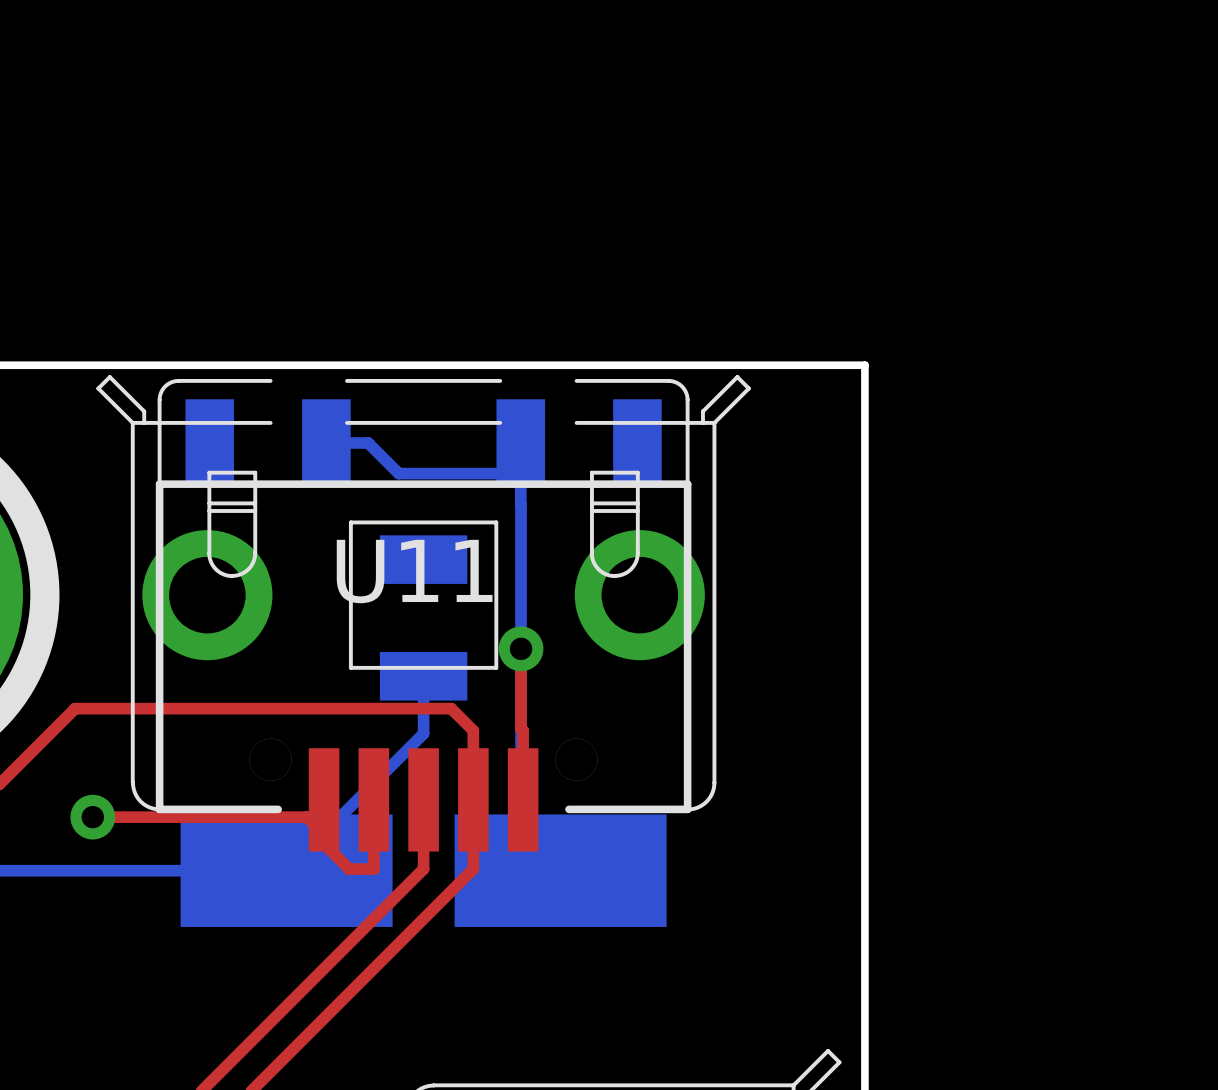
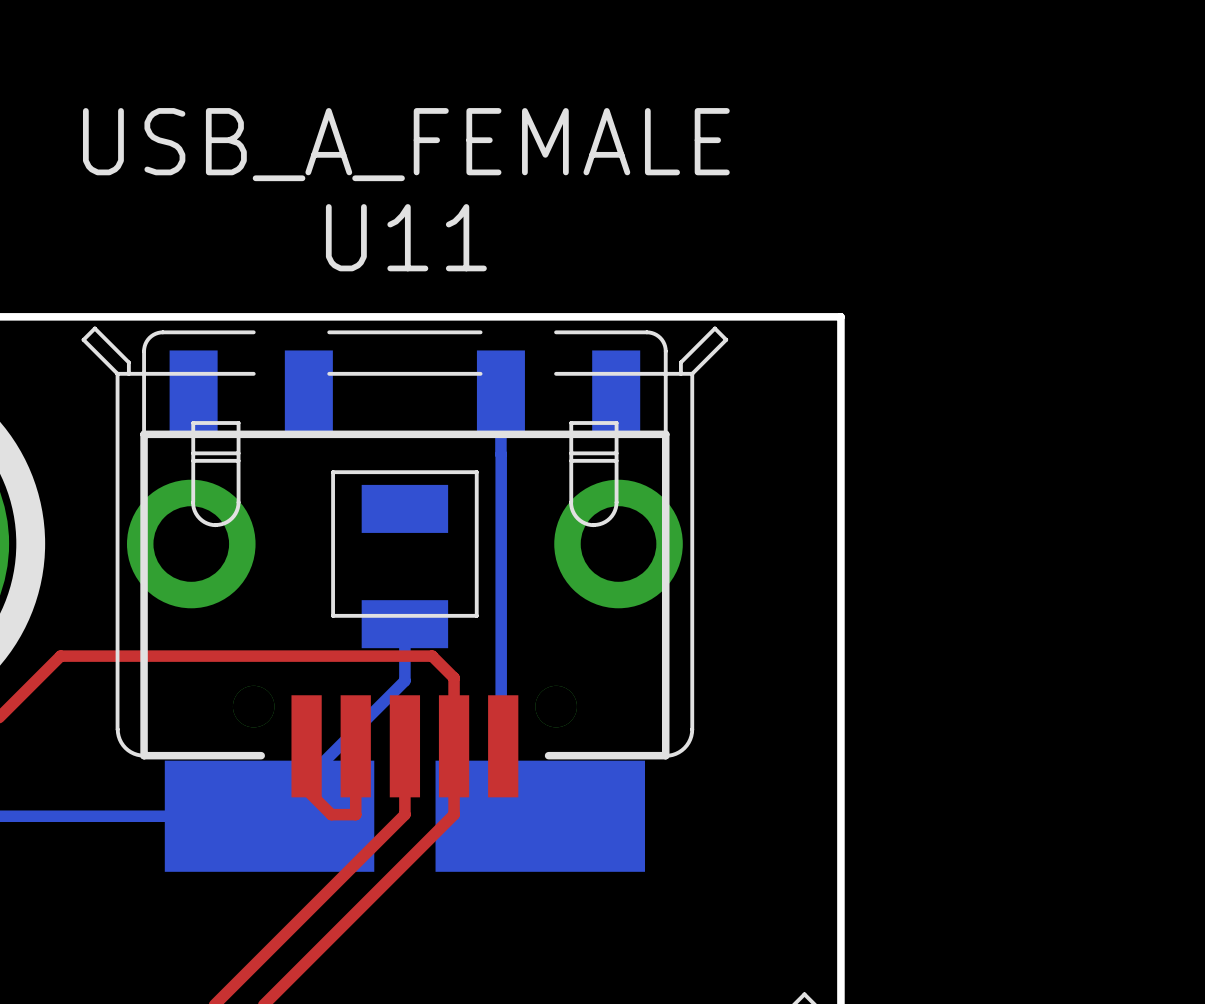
U11 value: none -> USB_A_FEMALE (406, 144)
bottom track: (326, 442) (368, 442) (398, 473) (520, 473) -> none
U11 name position: U11 (414, 571) -> U11 (406, 237)
top track: (521, 648) (523, 799) -> none
via: (521, 648) -> none
top track: (92, 817) (306, 817) (324, 834) -> none
via: (92, 817) -> none

